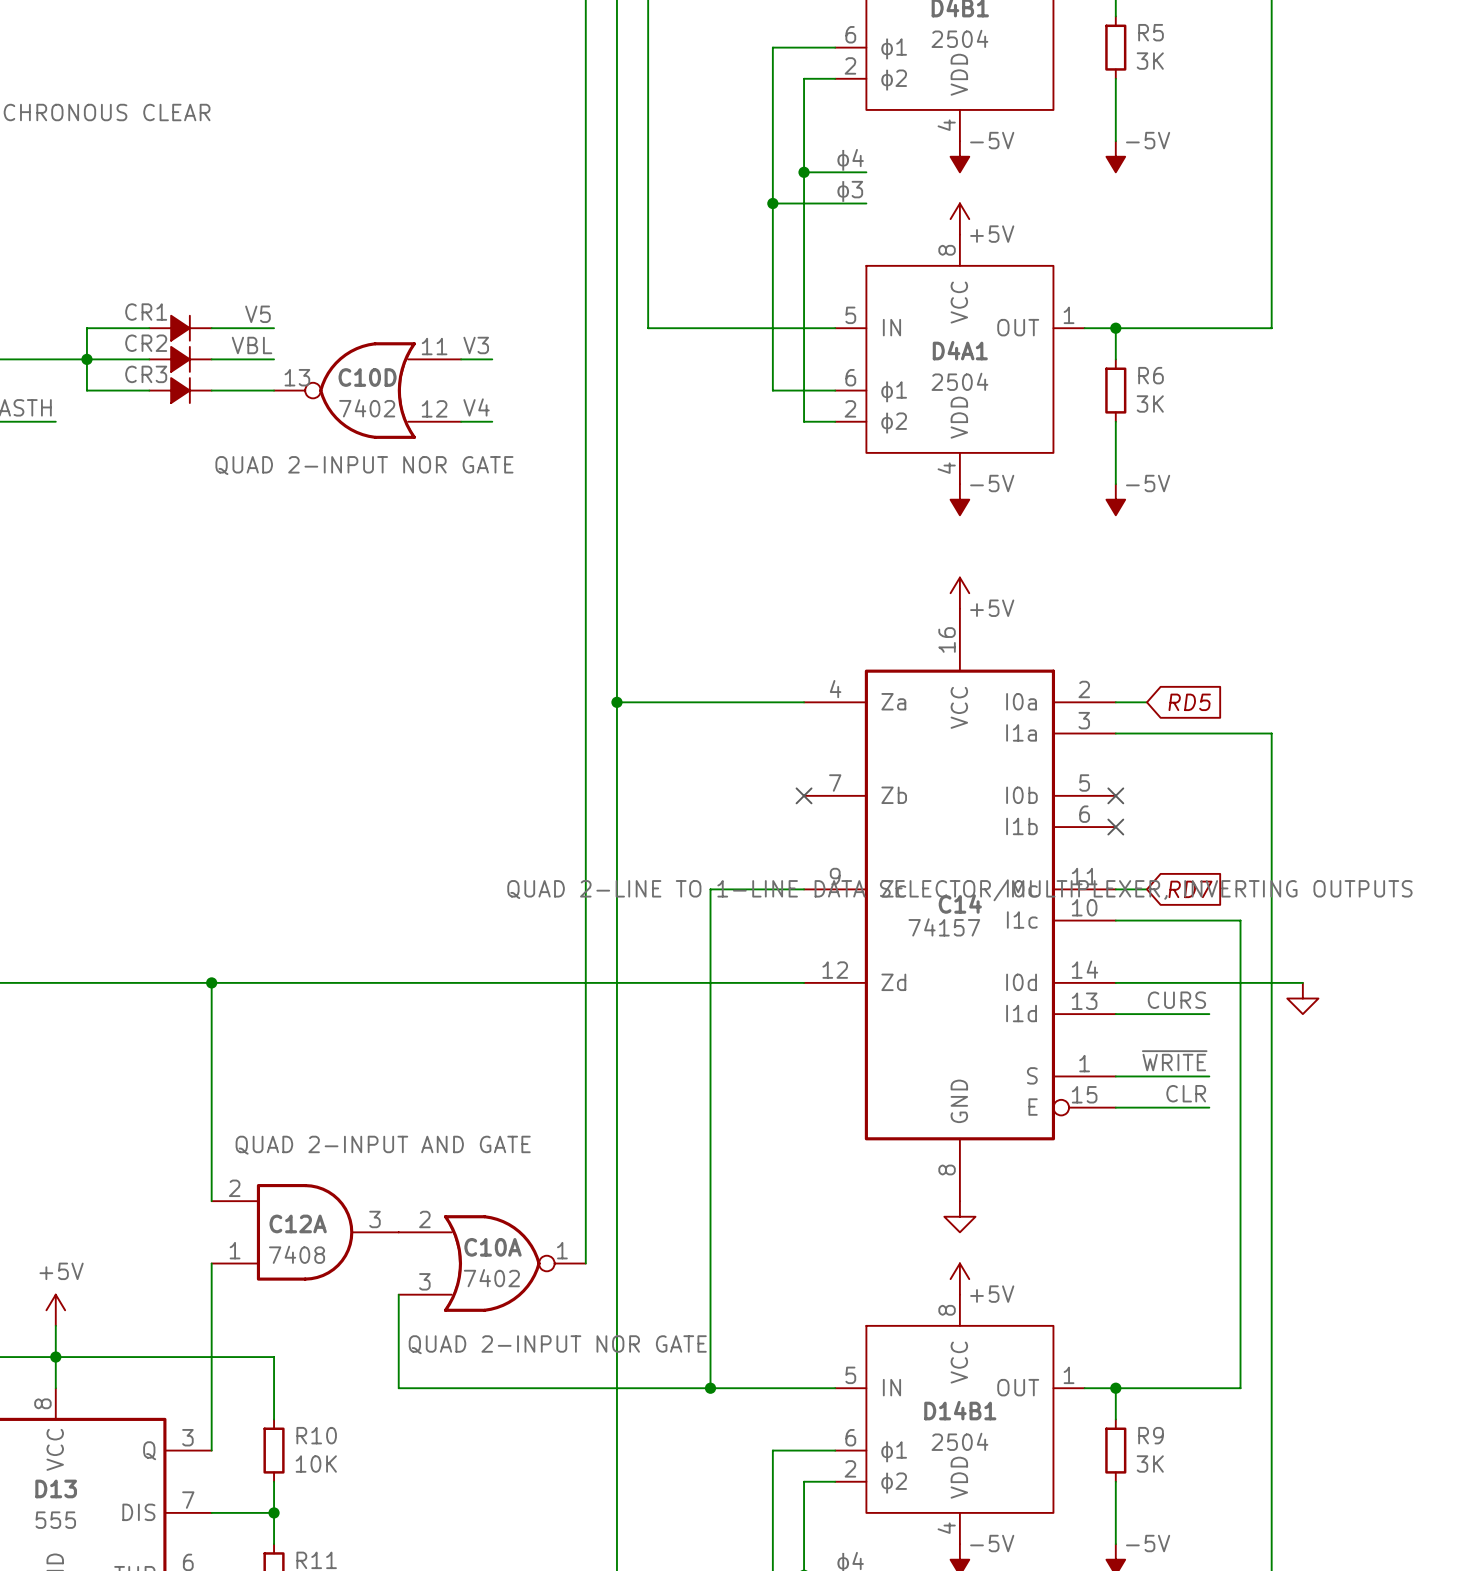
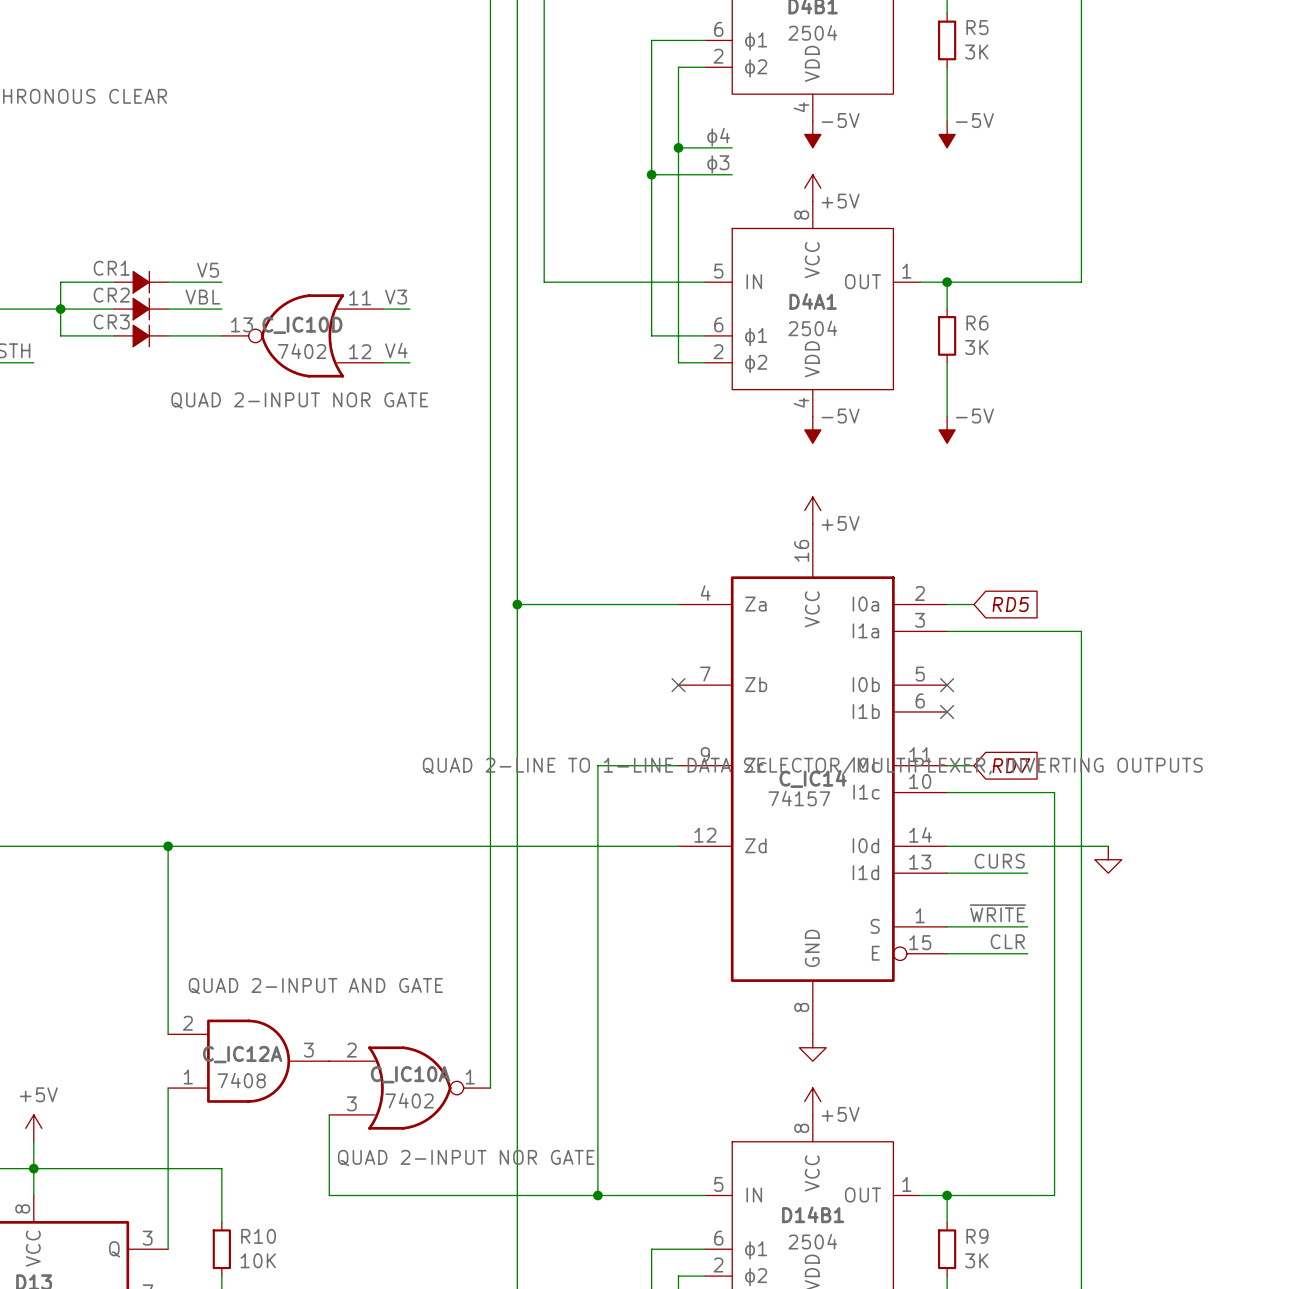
C10D name: C10D (367, 377) -> C_IC10D (302, 325)
C14 name: C14 (960, 904) -> C_IC14 (813, 778)
C12A name: C12A (298, 1223) -> C_IC12A (242, 1054)
C10A name: C10A (493, 1247) -> C_IC10A (410, 1074)

